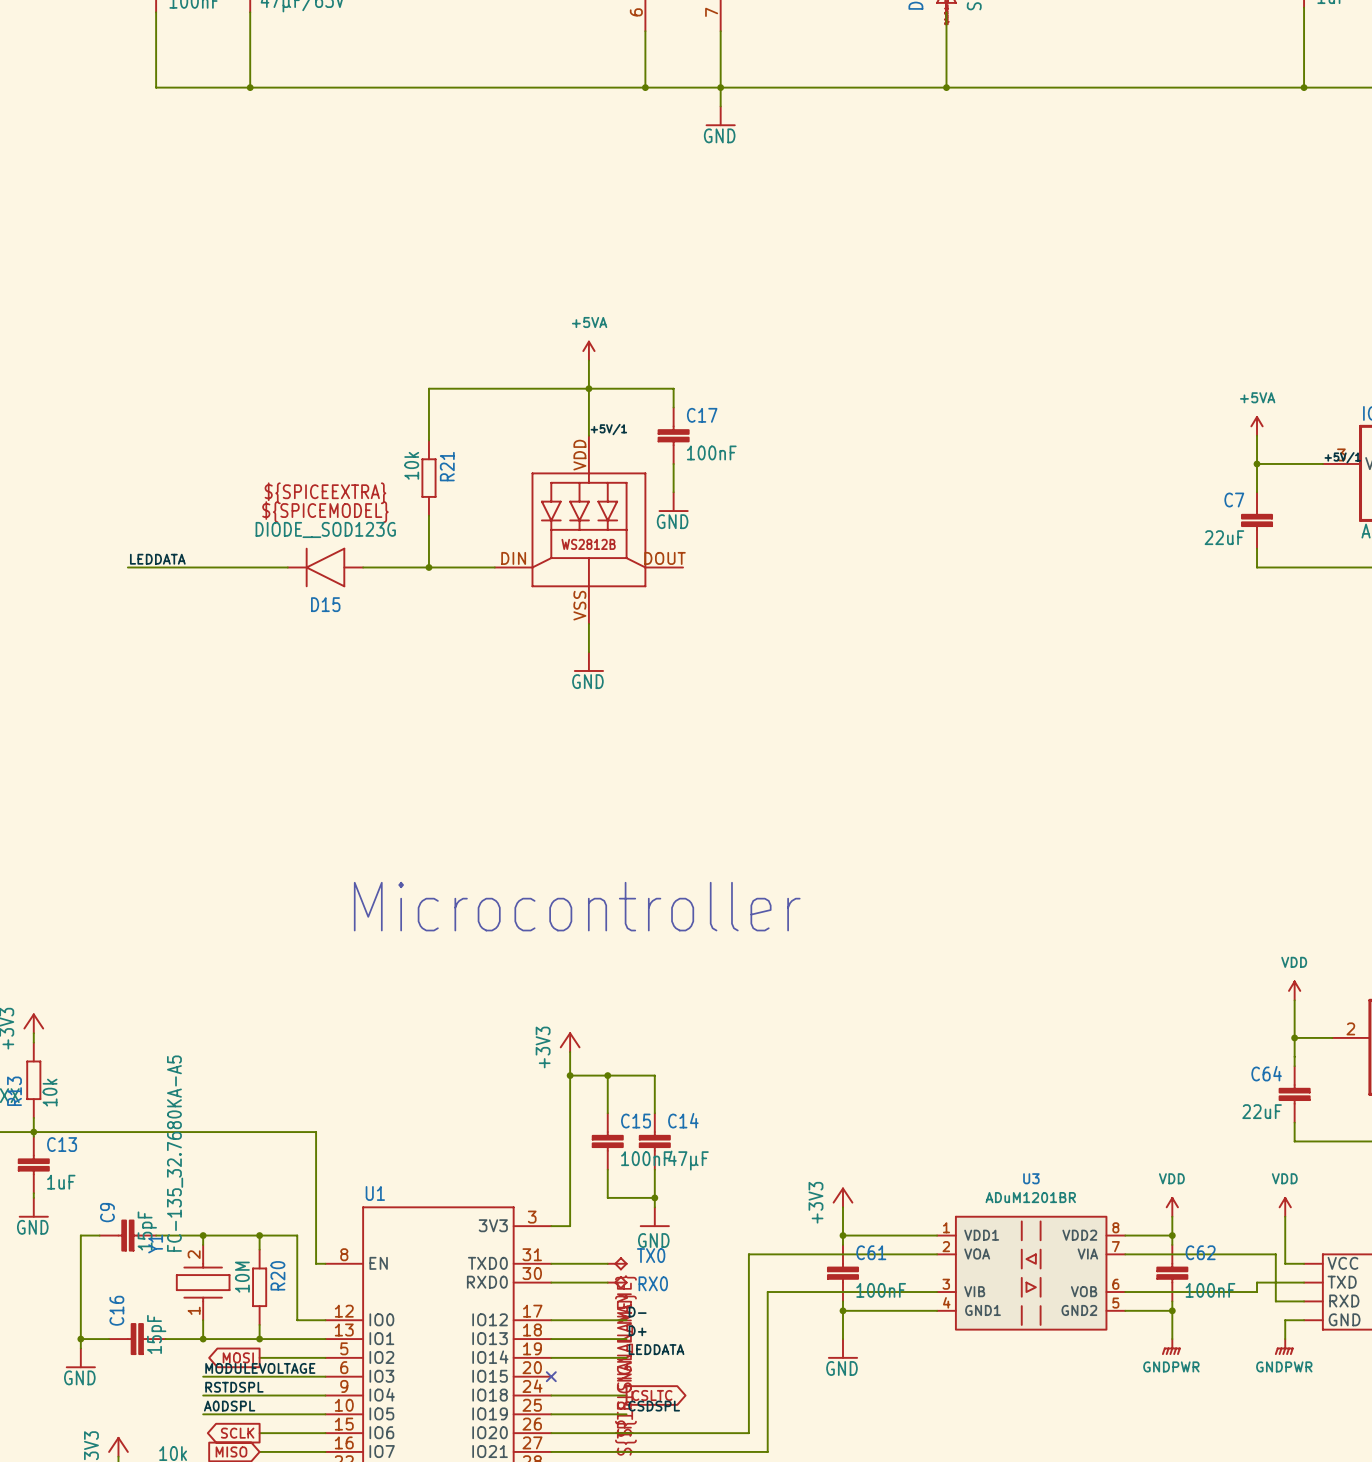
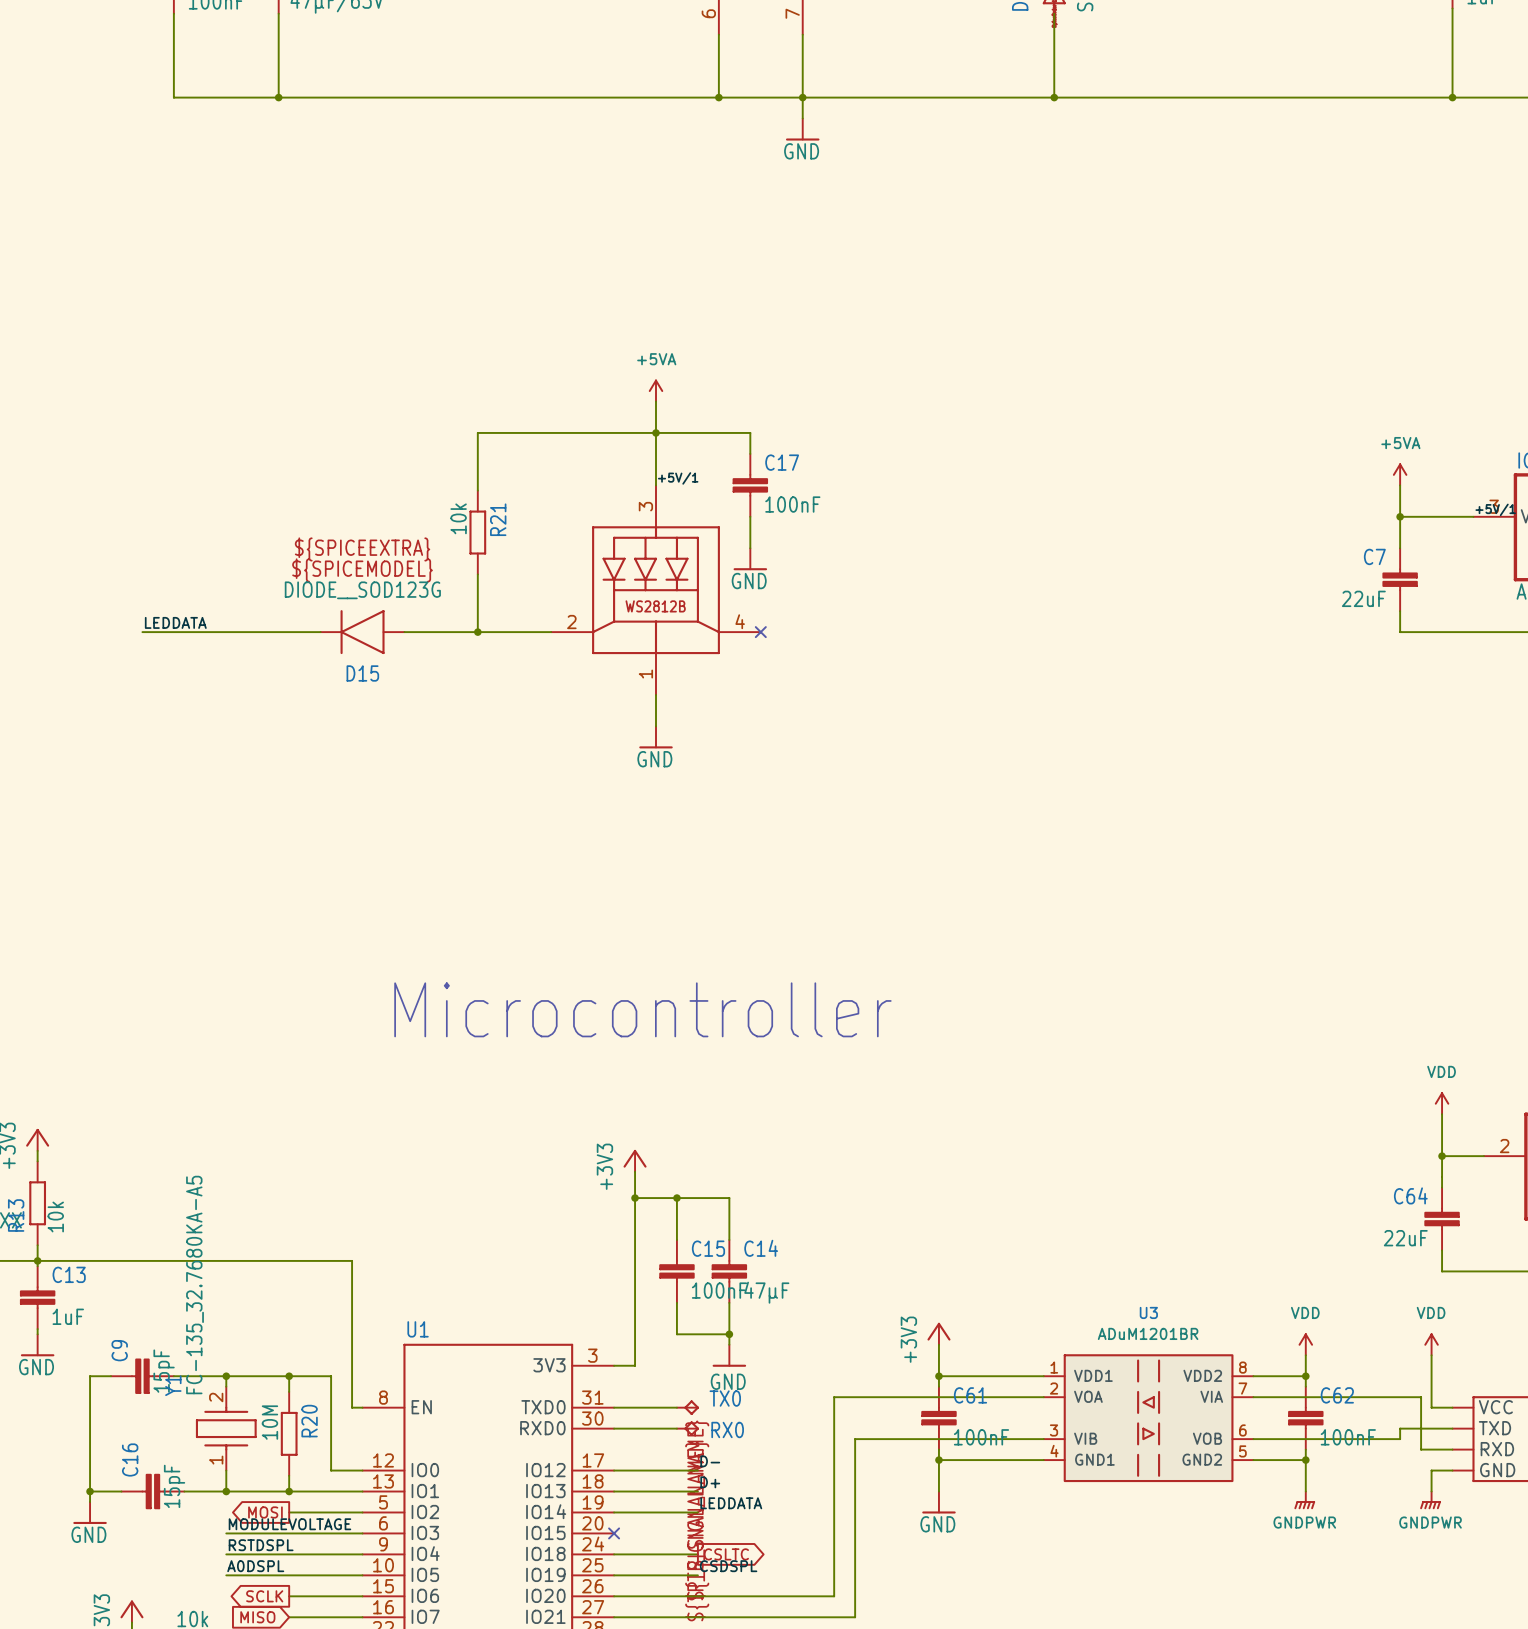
part pin number: VDD (579, 455) -> 3 (645, 506)
part pin number: DIN (513, 558) -> 2 (571, 622)
part pin number: DOUT (665, 558) -> 4 (740, 621)
no-connect mark: none -> (760, 632)
part pin number: VSS (579, 605) -> 1 (645, 674)

